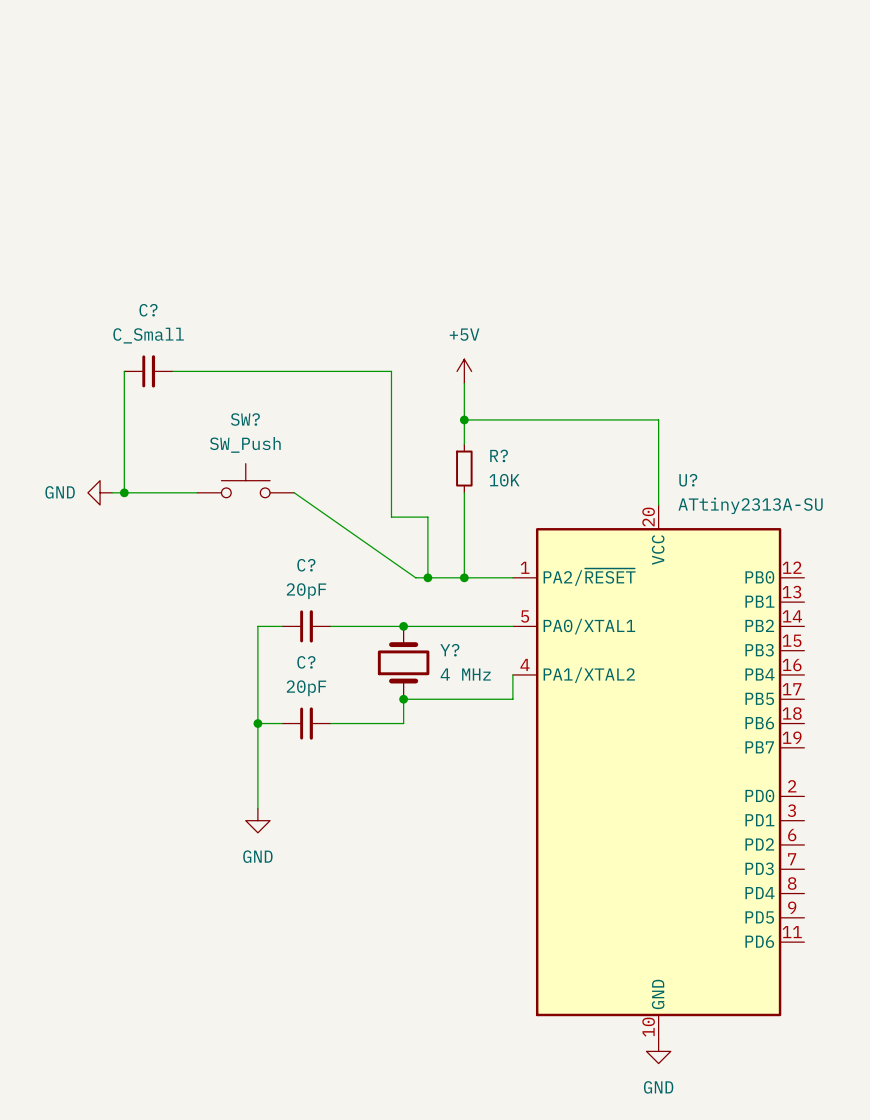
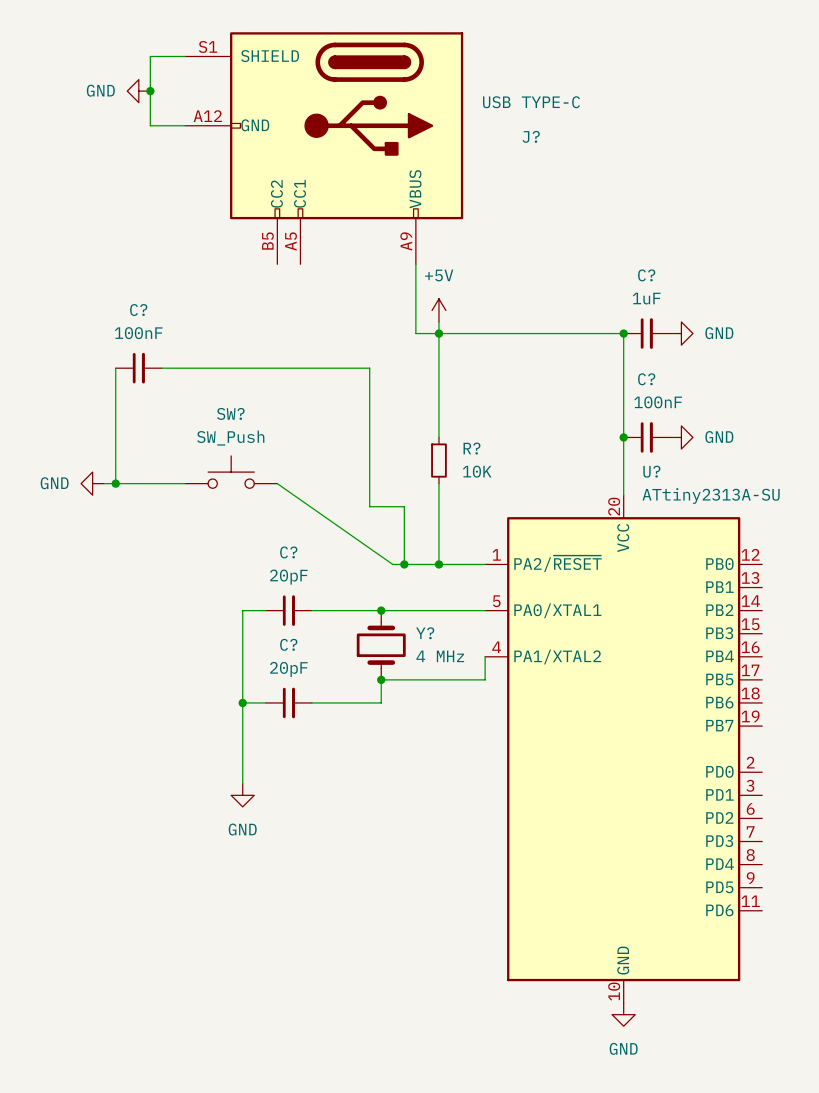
wire: none -> (184, 56) (150, 56) (150, 125) (184, 125)
power symbol: none -> GND (138, 91)
junction: none -> (150, 91)
J?: none -> USB TYPE-C (324, 148)
wire: none -> (438, 322) (438, 379)
junction: none -> (438, 333)
junction: none -> (623, 333)
C?: none -> 1uF (646, 333)
power symbol: none -> GND (681, 333)
C? value: C_Small (148, 335) -> 100nF (138, 333)
power symbol position: +5V (464, 371) -> +5V (438, 310)
wire: (464, 419) (658, 419) -> (415, 264) (415, 333) (623, 333) (623, 414)
junction: (464, 419) -> none
junction: none -> (623, 437)
C?: none -> 100nF (646, 437)
power symbol: none -> GND (681, 437)

